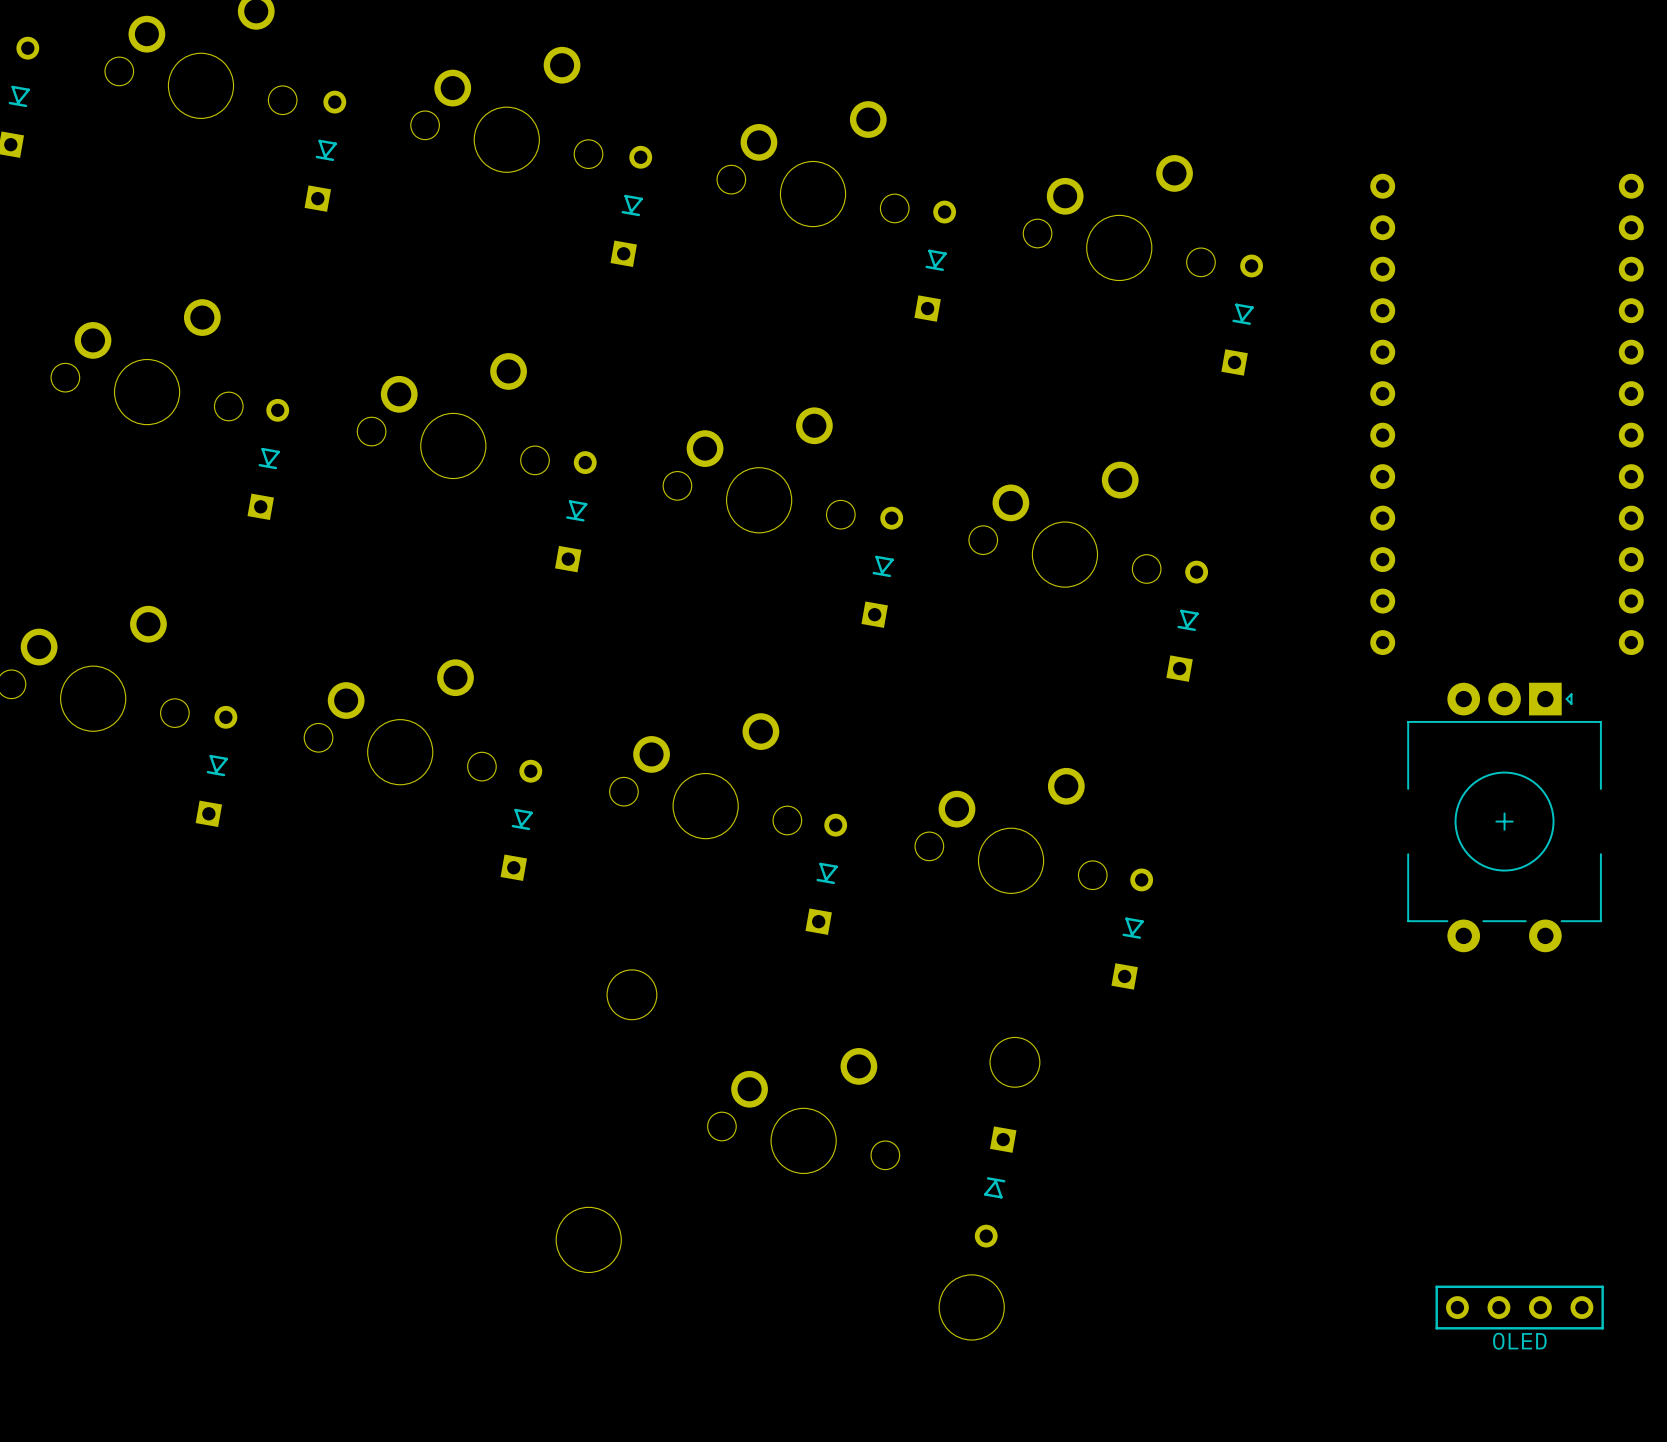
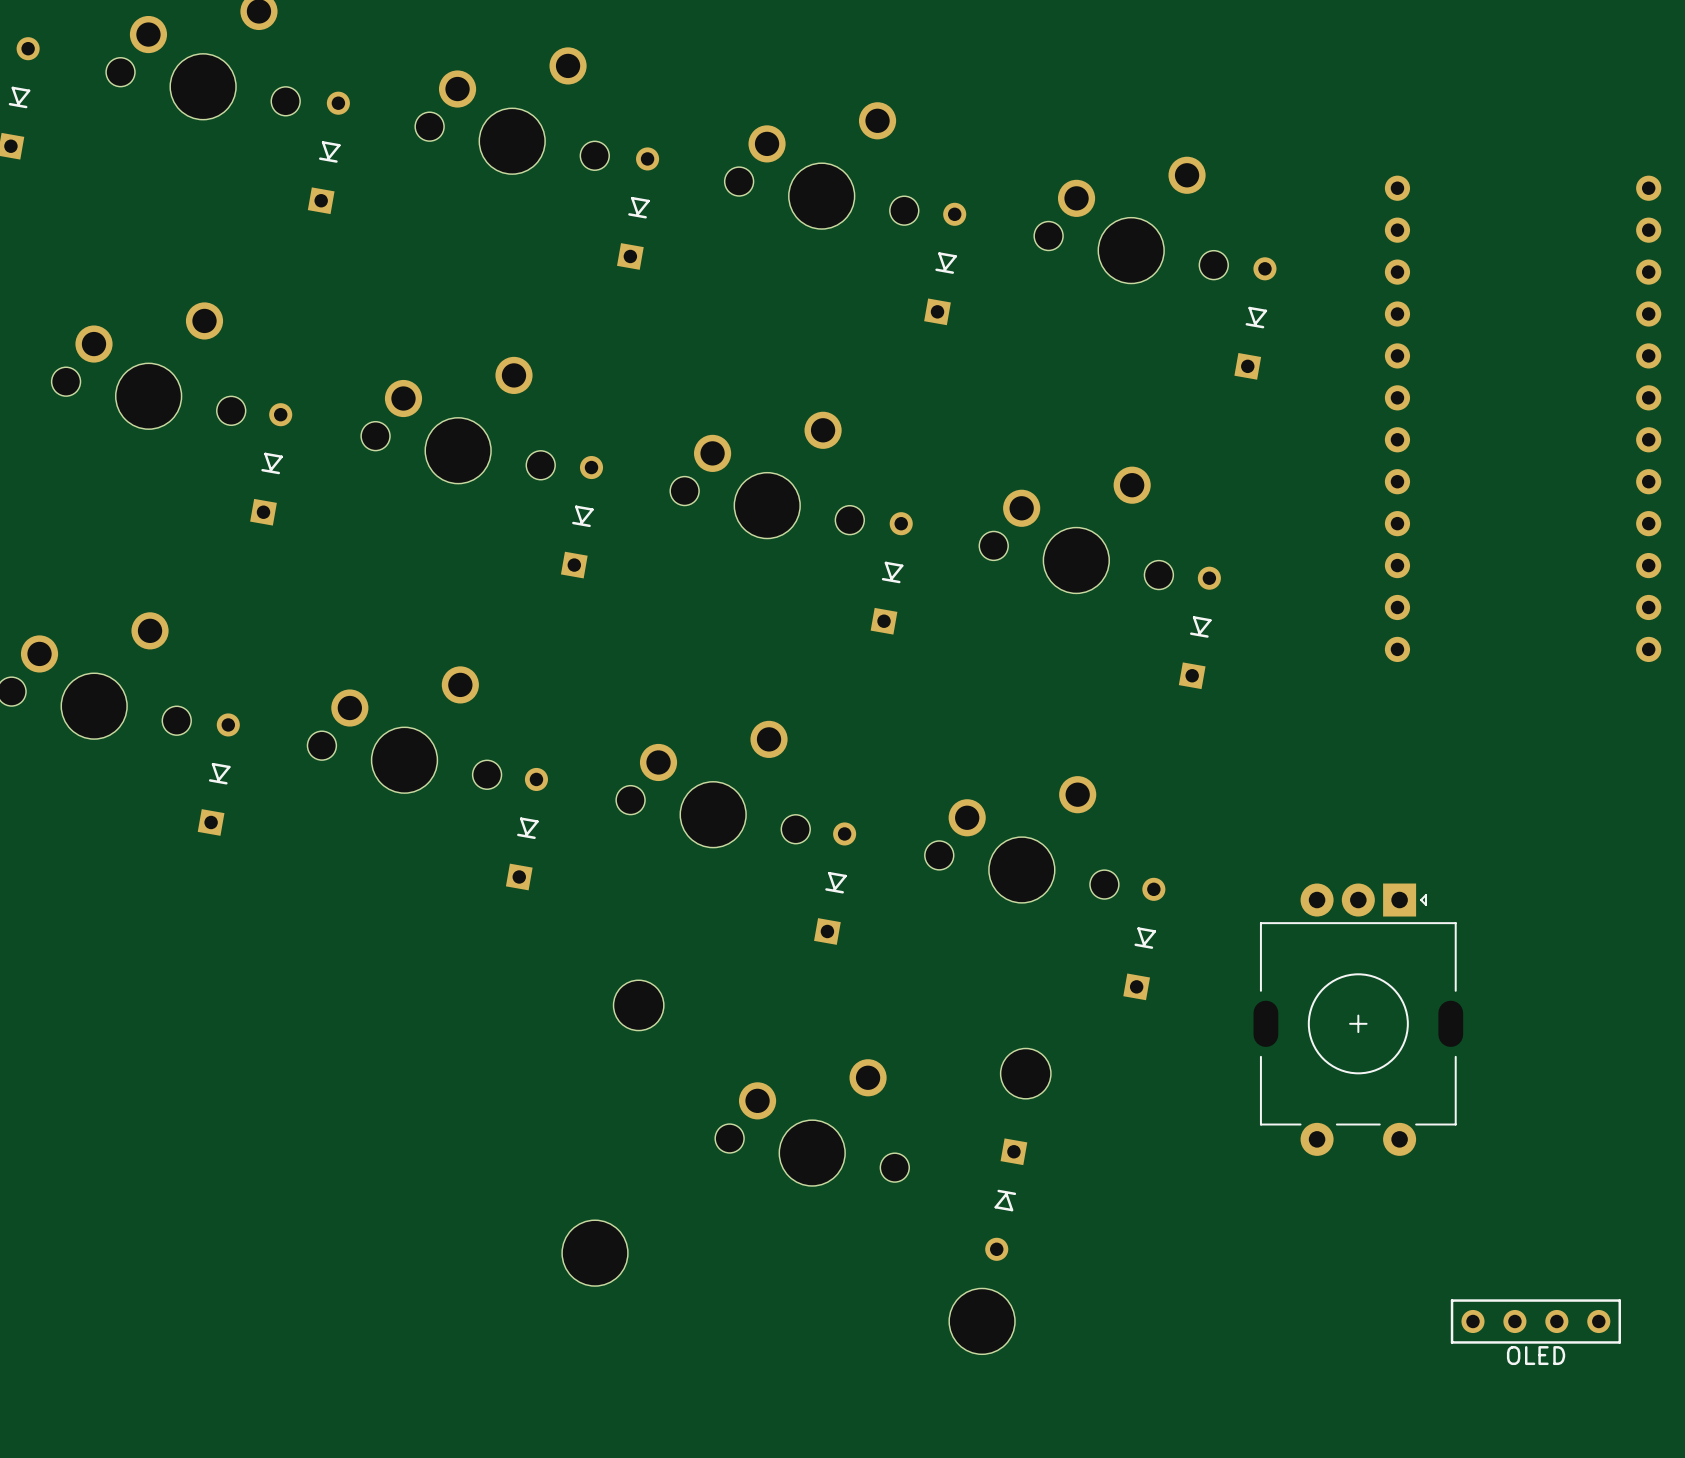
part position: (1504, 817) -> (1358, 1019)

